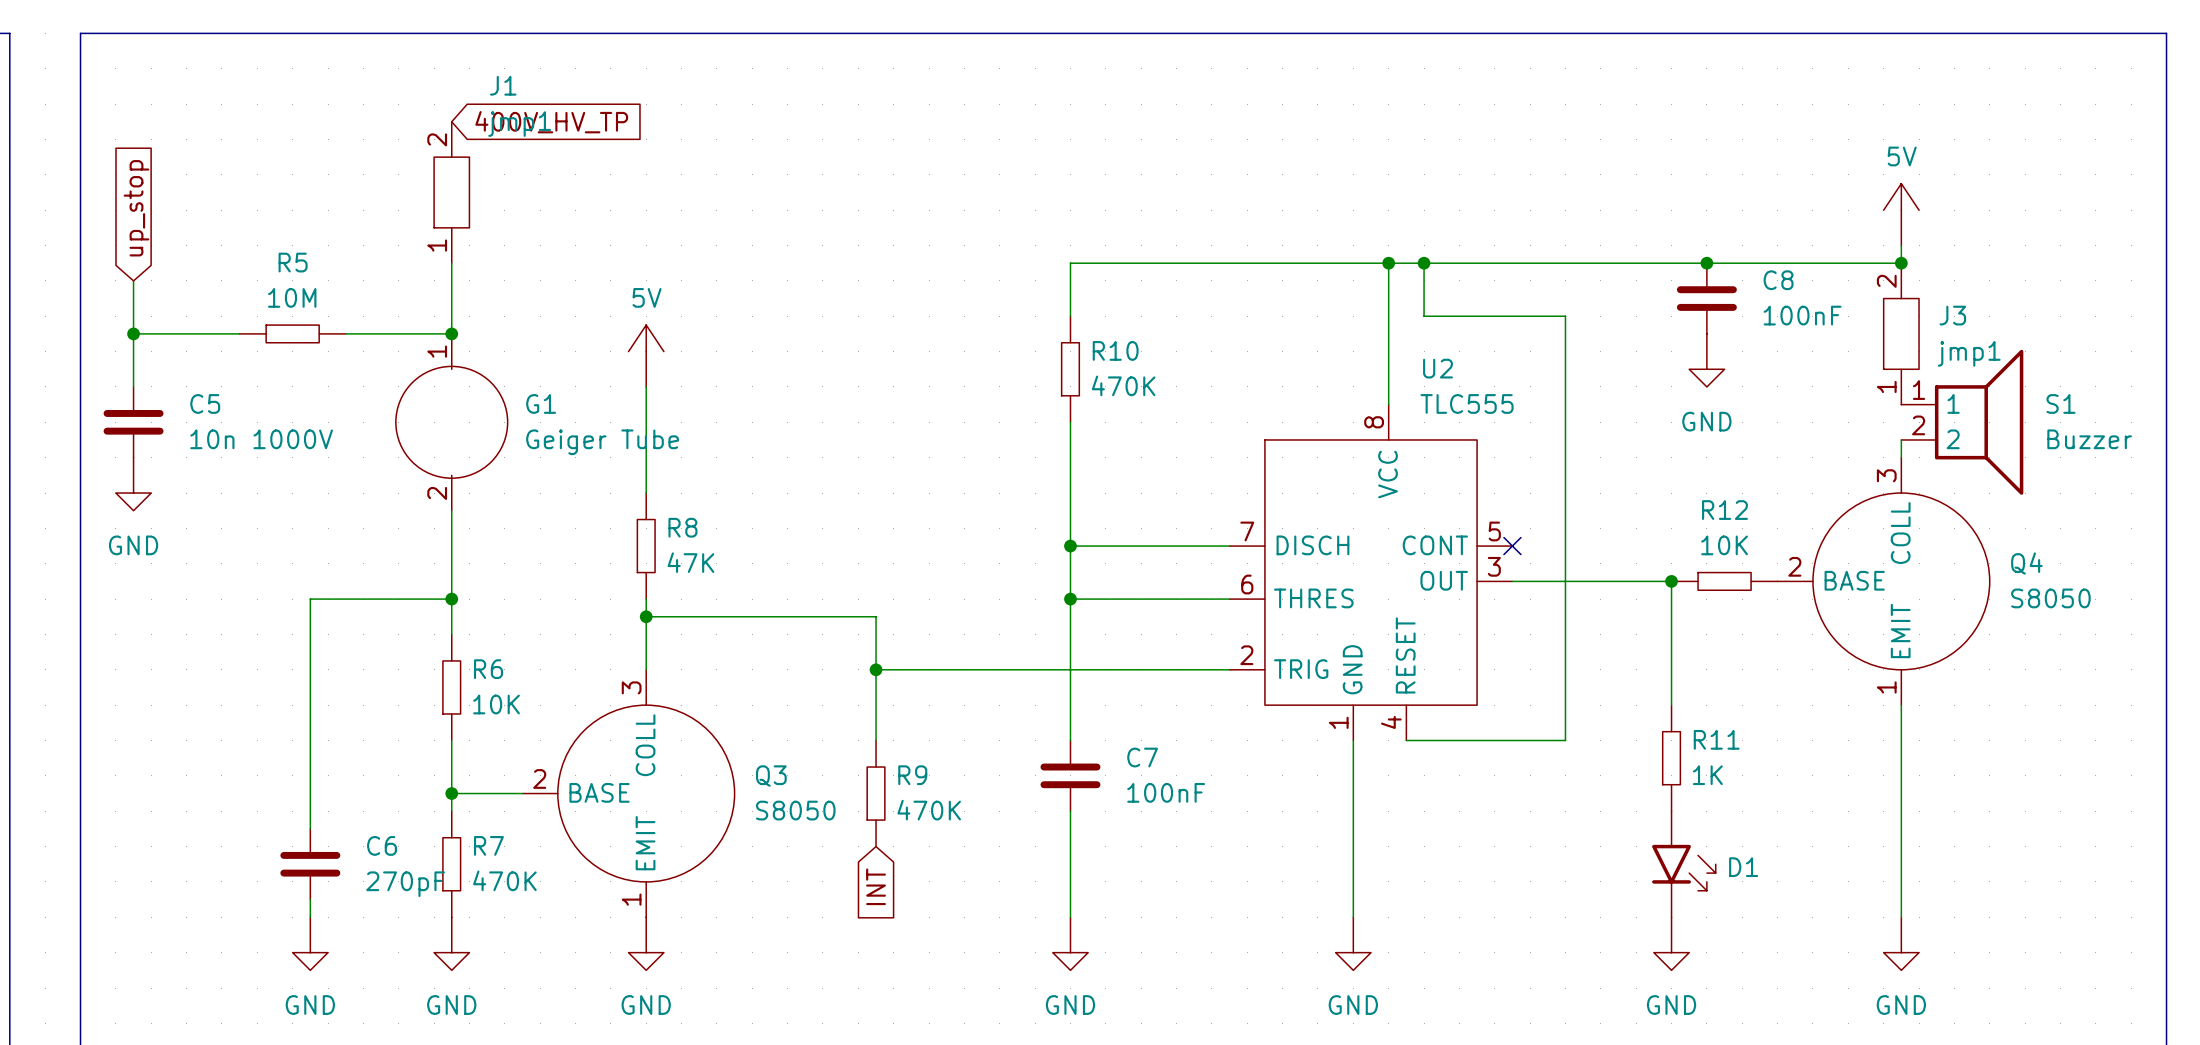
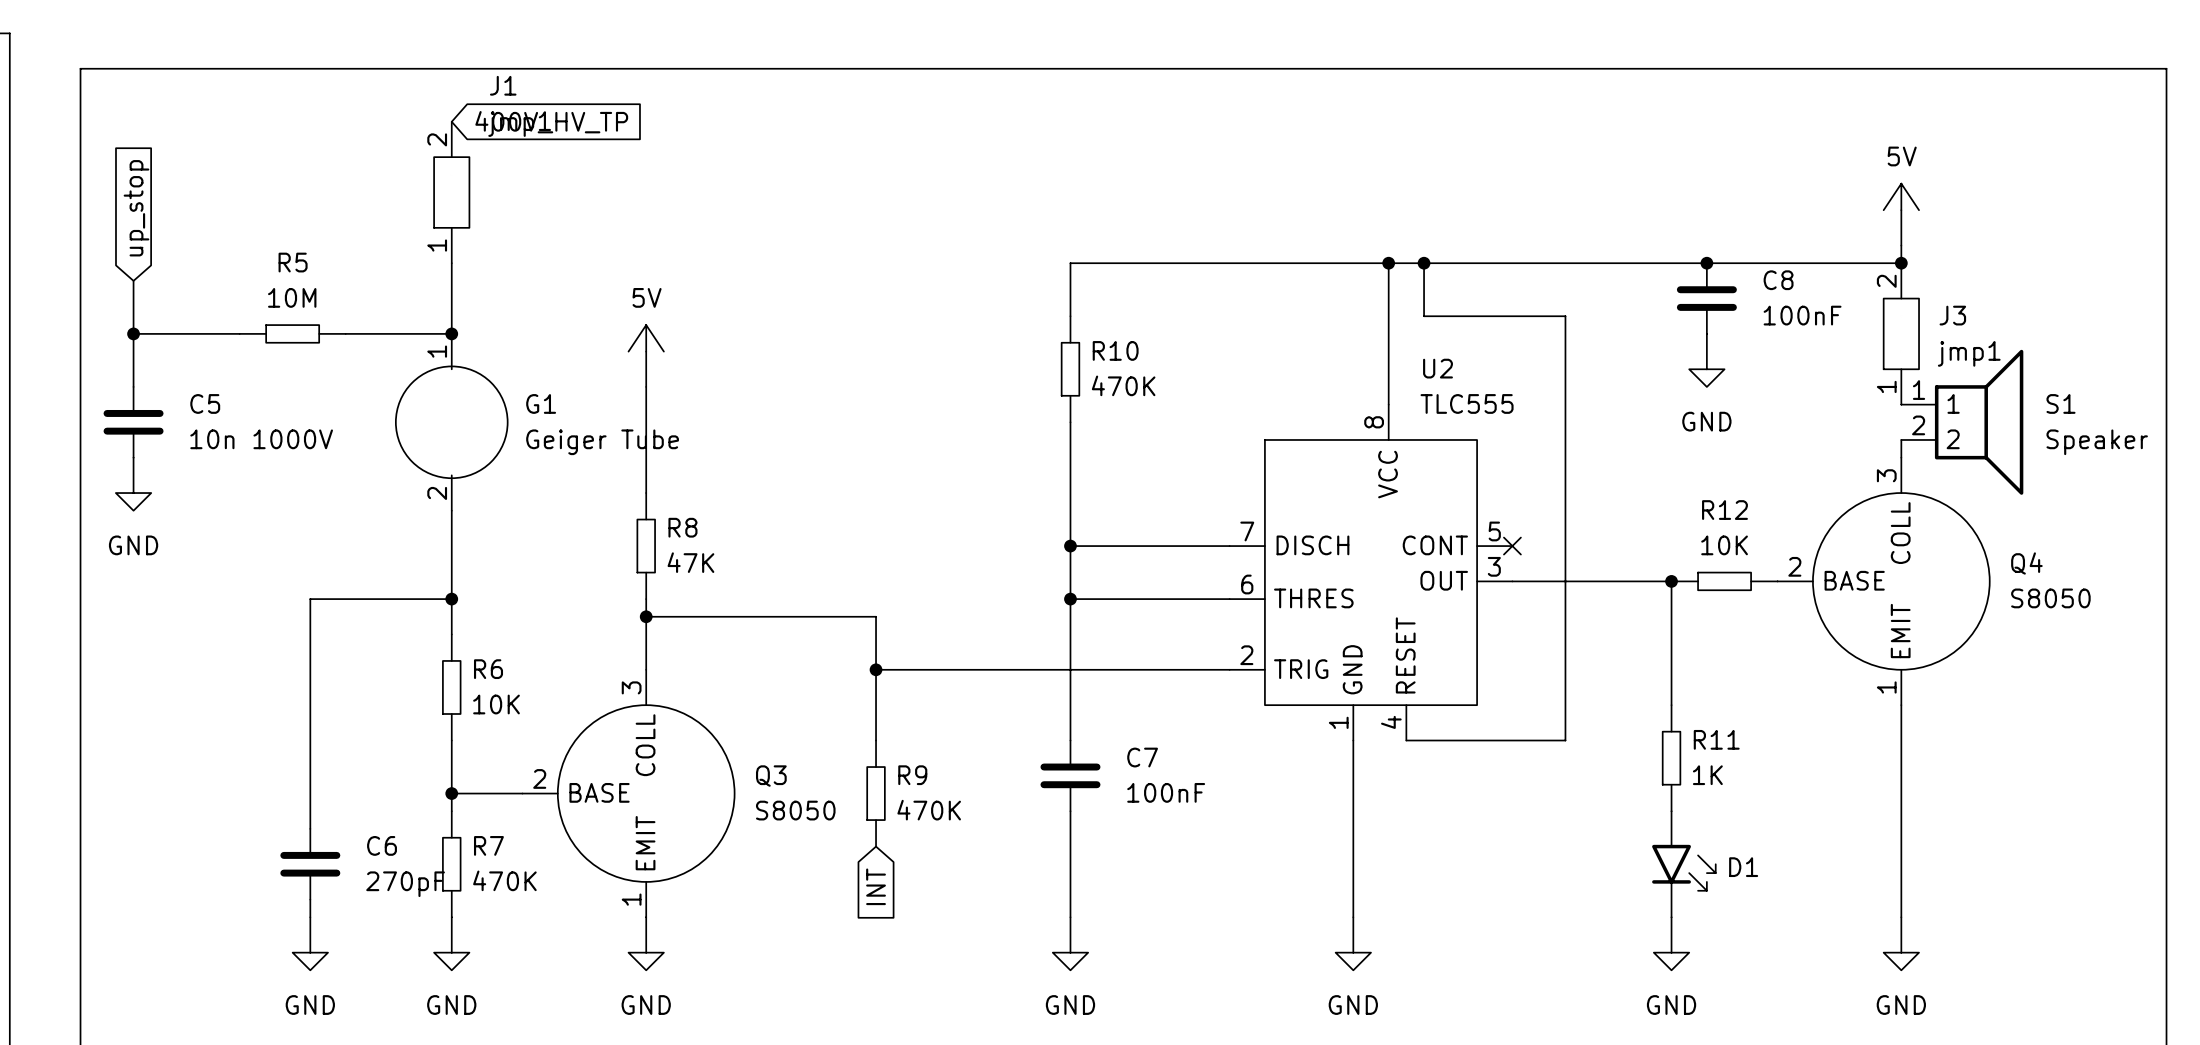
line: (80, 68) (80, 33) (2166, 33) (2166, 68) -> (80, 68) (2166, 68)
S1 value: Buzzer (2089, 439) -> Speaker (2097, 442)

